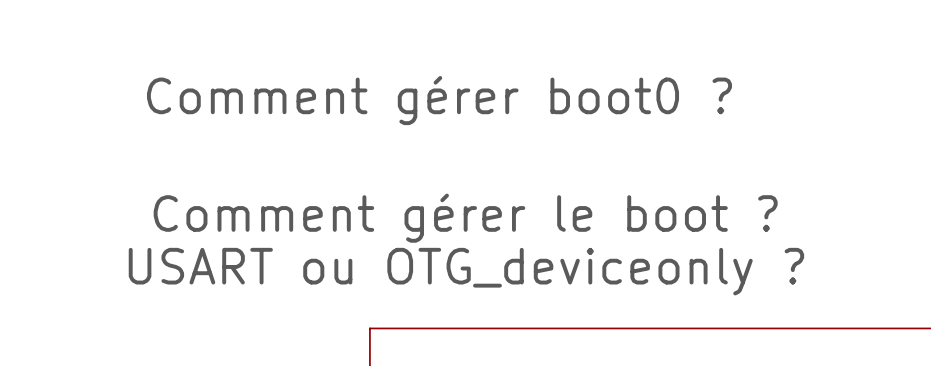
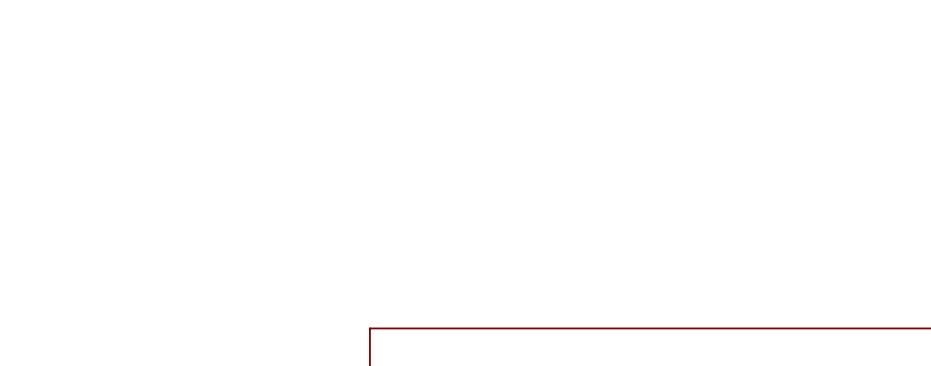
text: Comment gérer boot0 ? (439, 100) -> none
text: Comment gérer le boot ? (465, 218) -> none
text: USART ou OTG_deviceonly ? (466, 271) -> none

